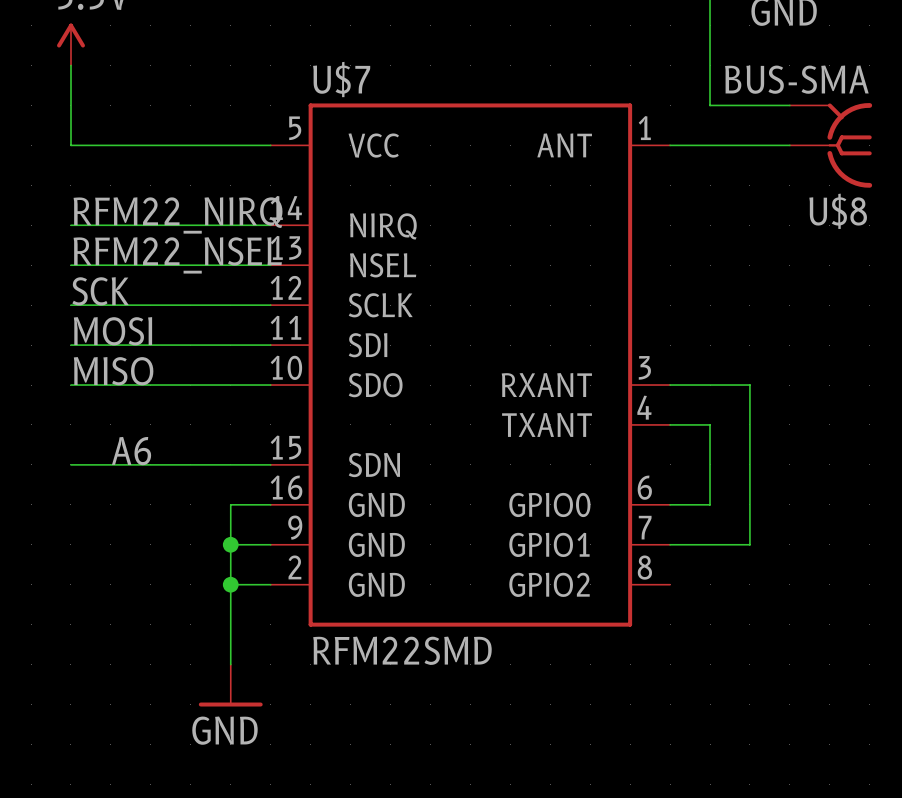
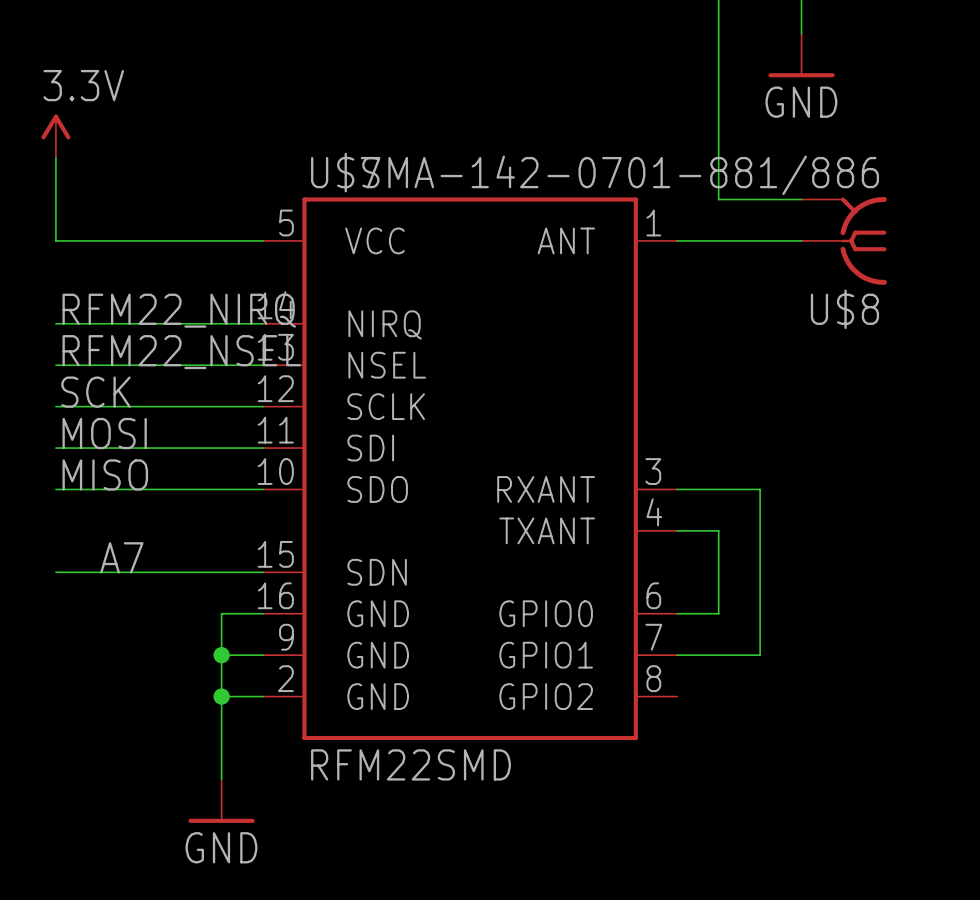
U$8 value: BUS-SMA (796, 79) -> SMA-142-0701-881/886 (620, 175)
label: A6 (131, 451) -> A7 (121, 557)

